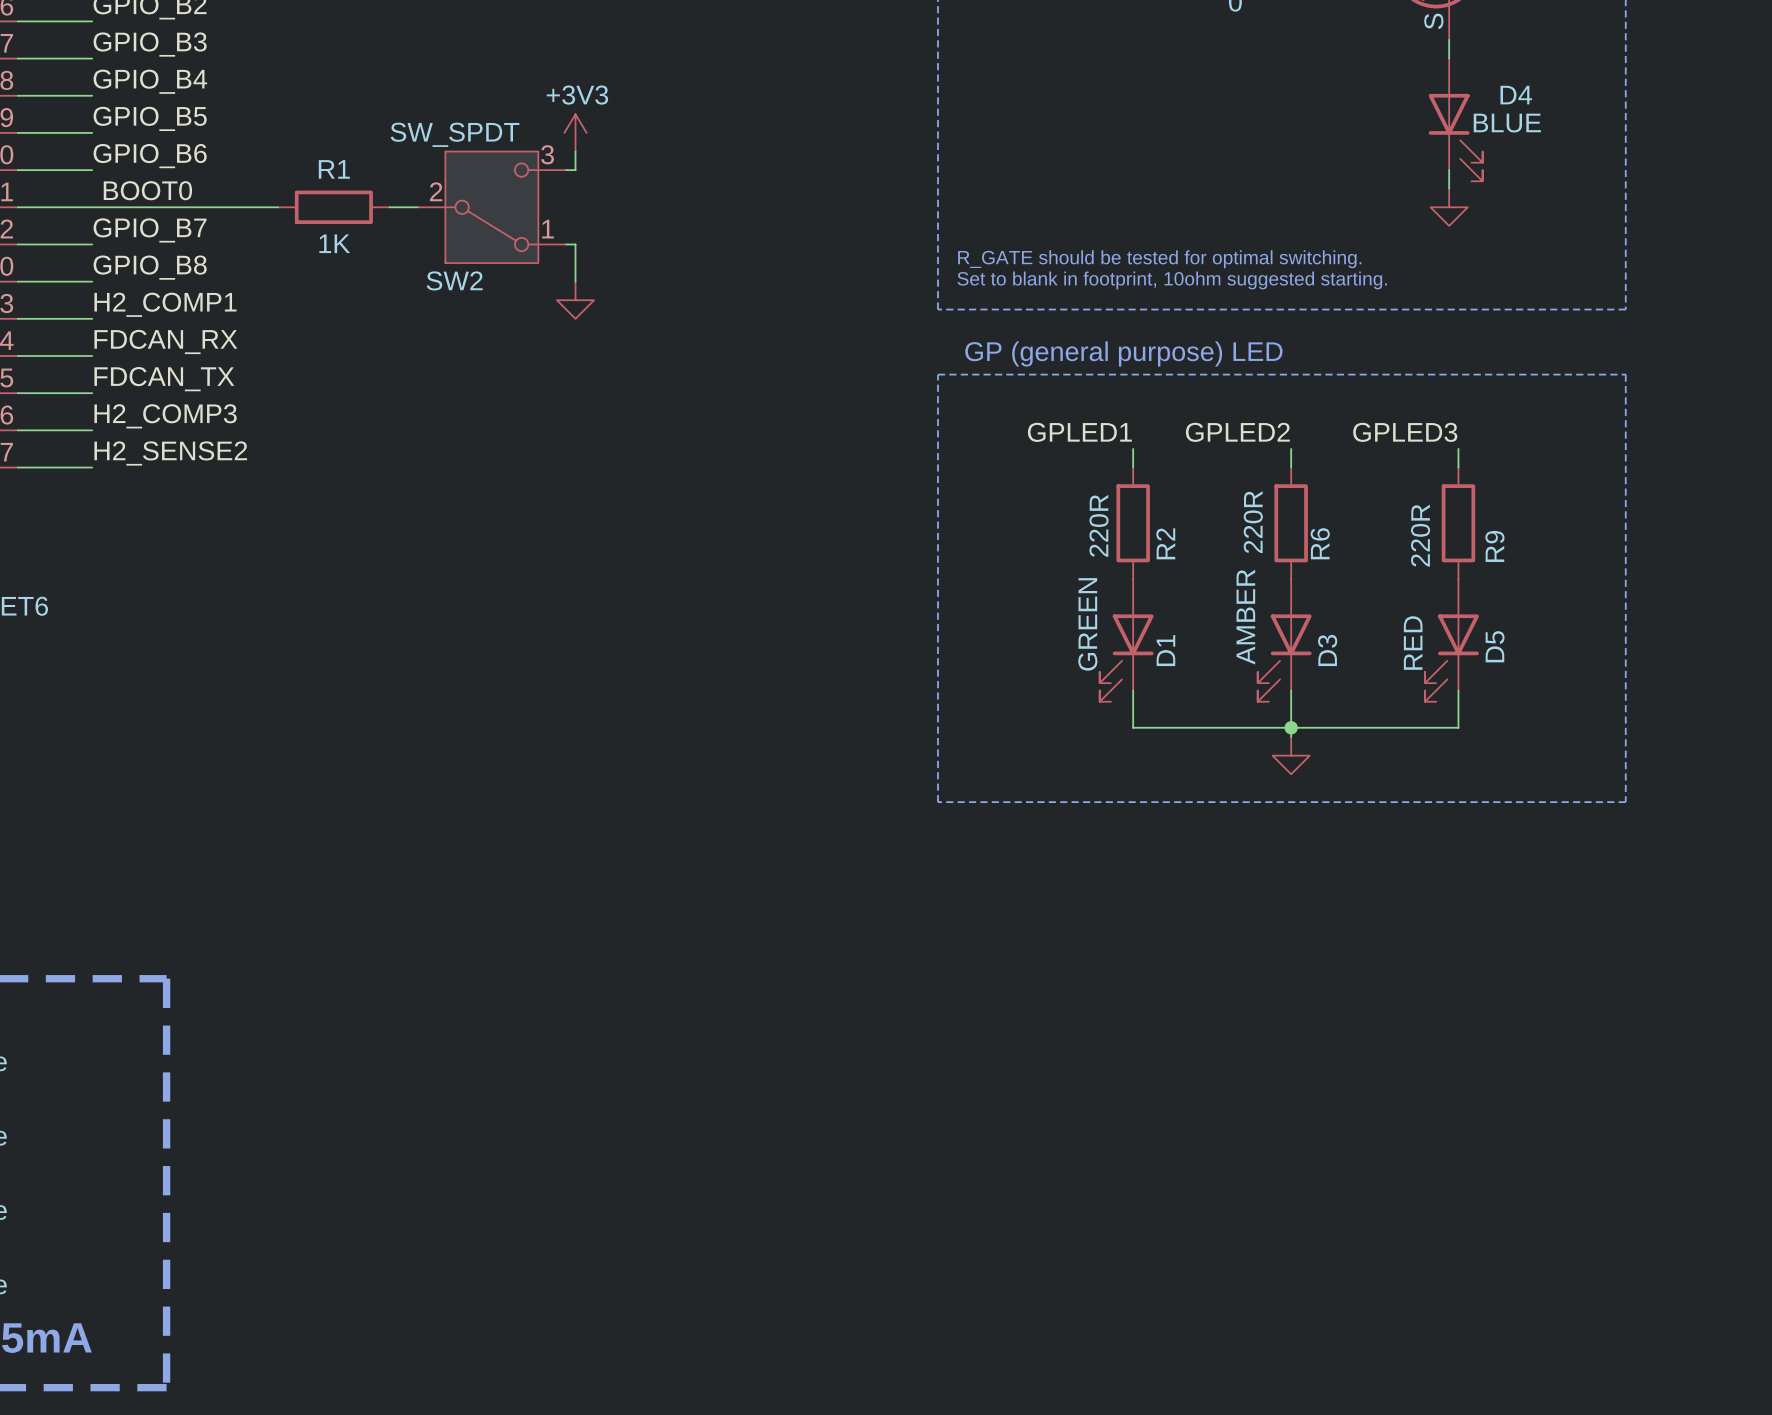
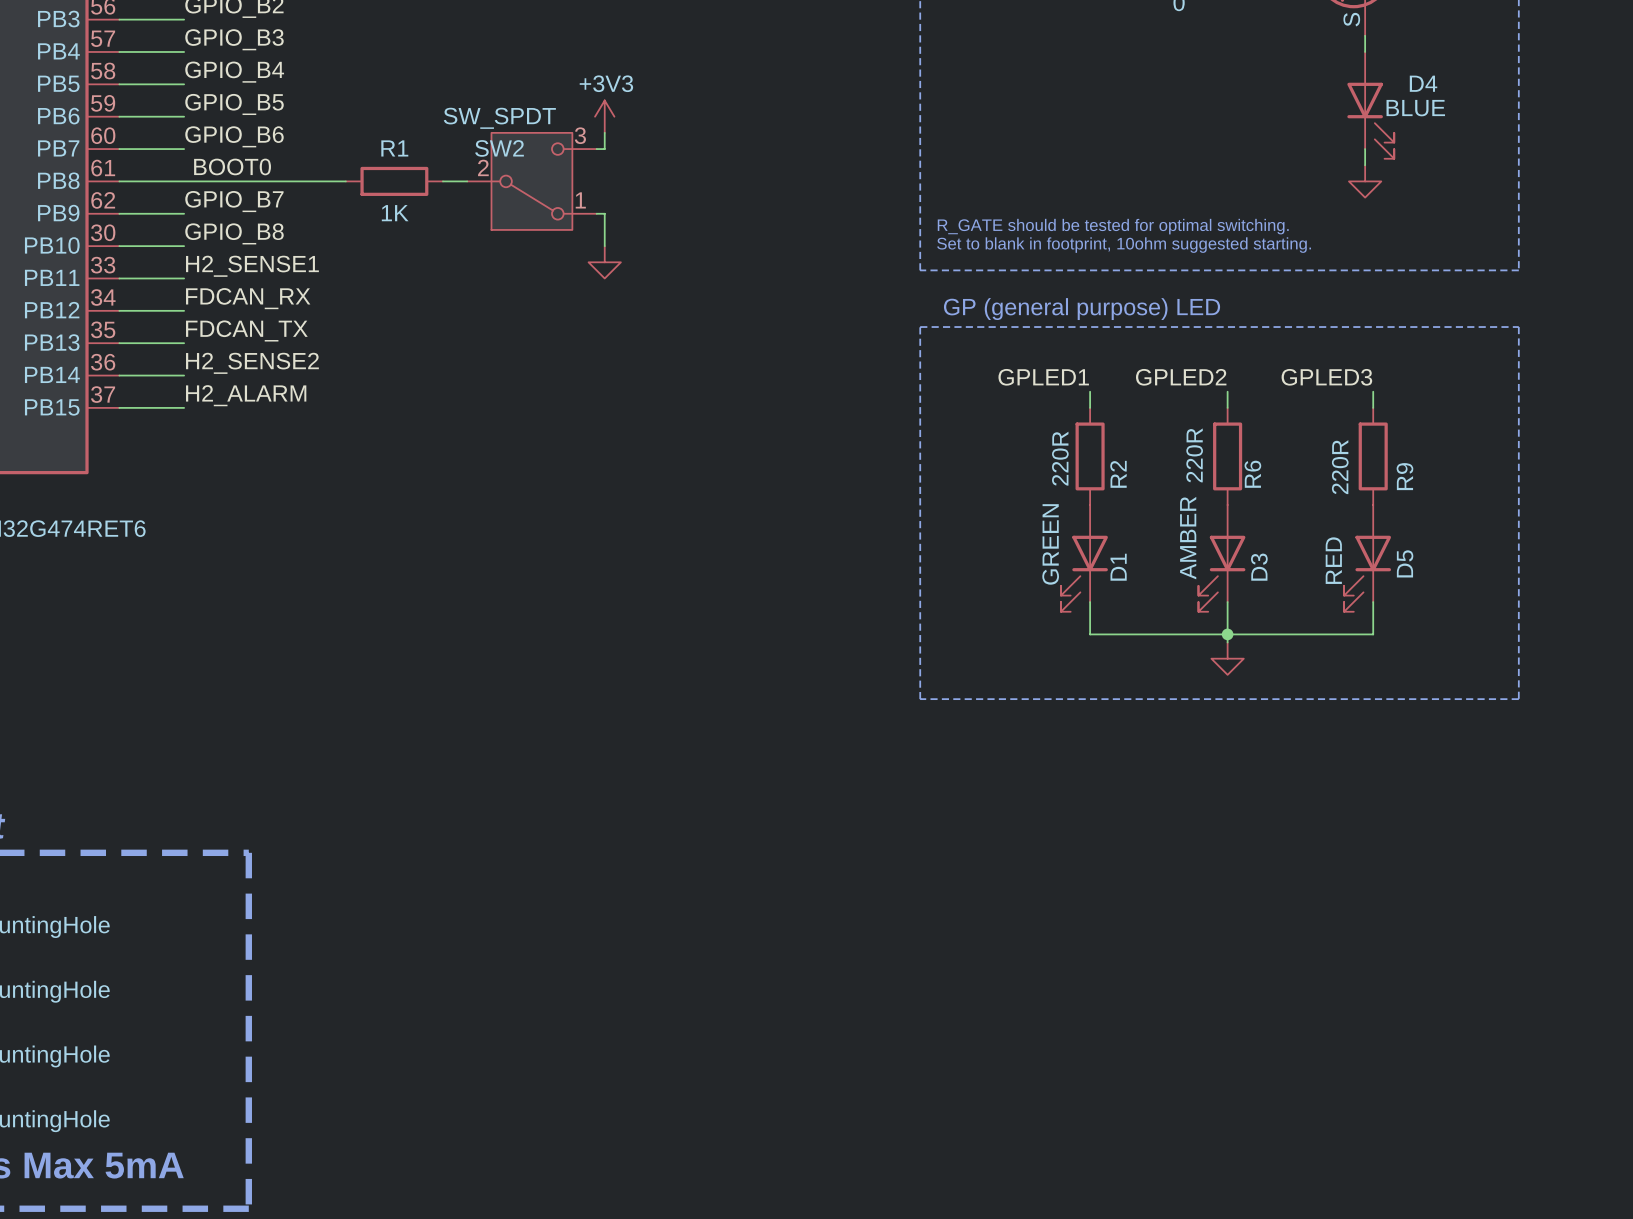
SW2 name position: SW2 (454, 280) -> SW2 (499, 148)
label: H2_COMP1 (165, 304) -> H2_SENSE1 (252, 266)
label: H2_COMP3 (165, 416) -> H2_SENSE2 (252, 363)
label: H2_SENSE2 (170, 453) -> H2_ALARM (246, 395)

